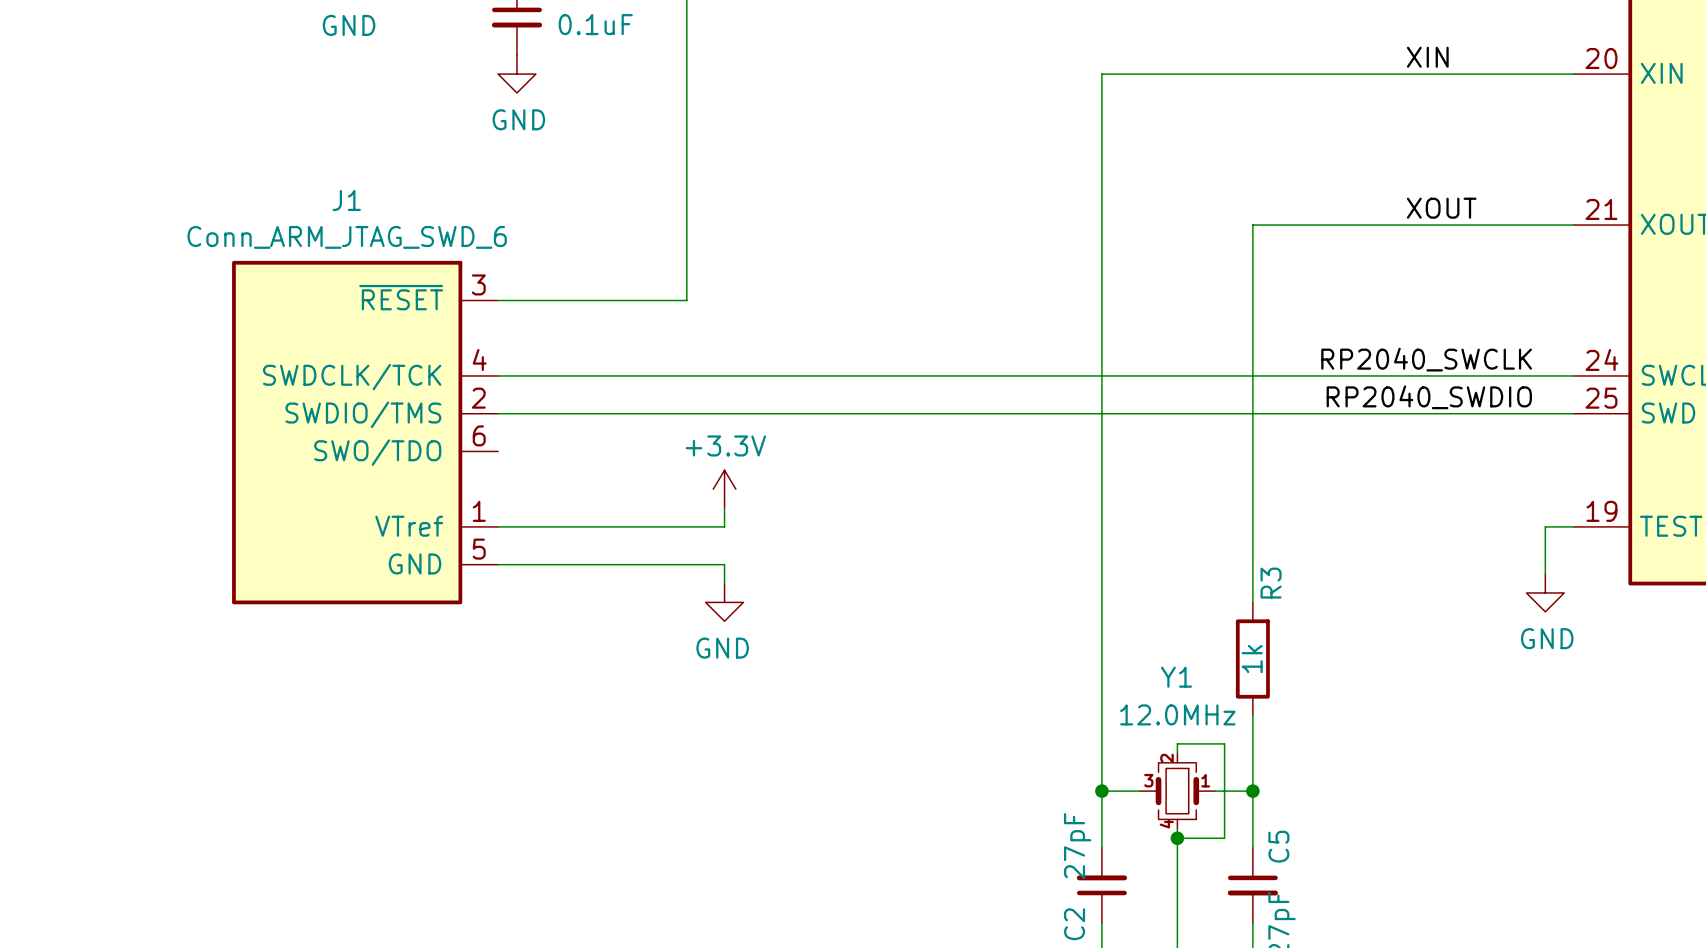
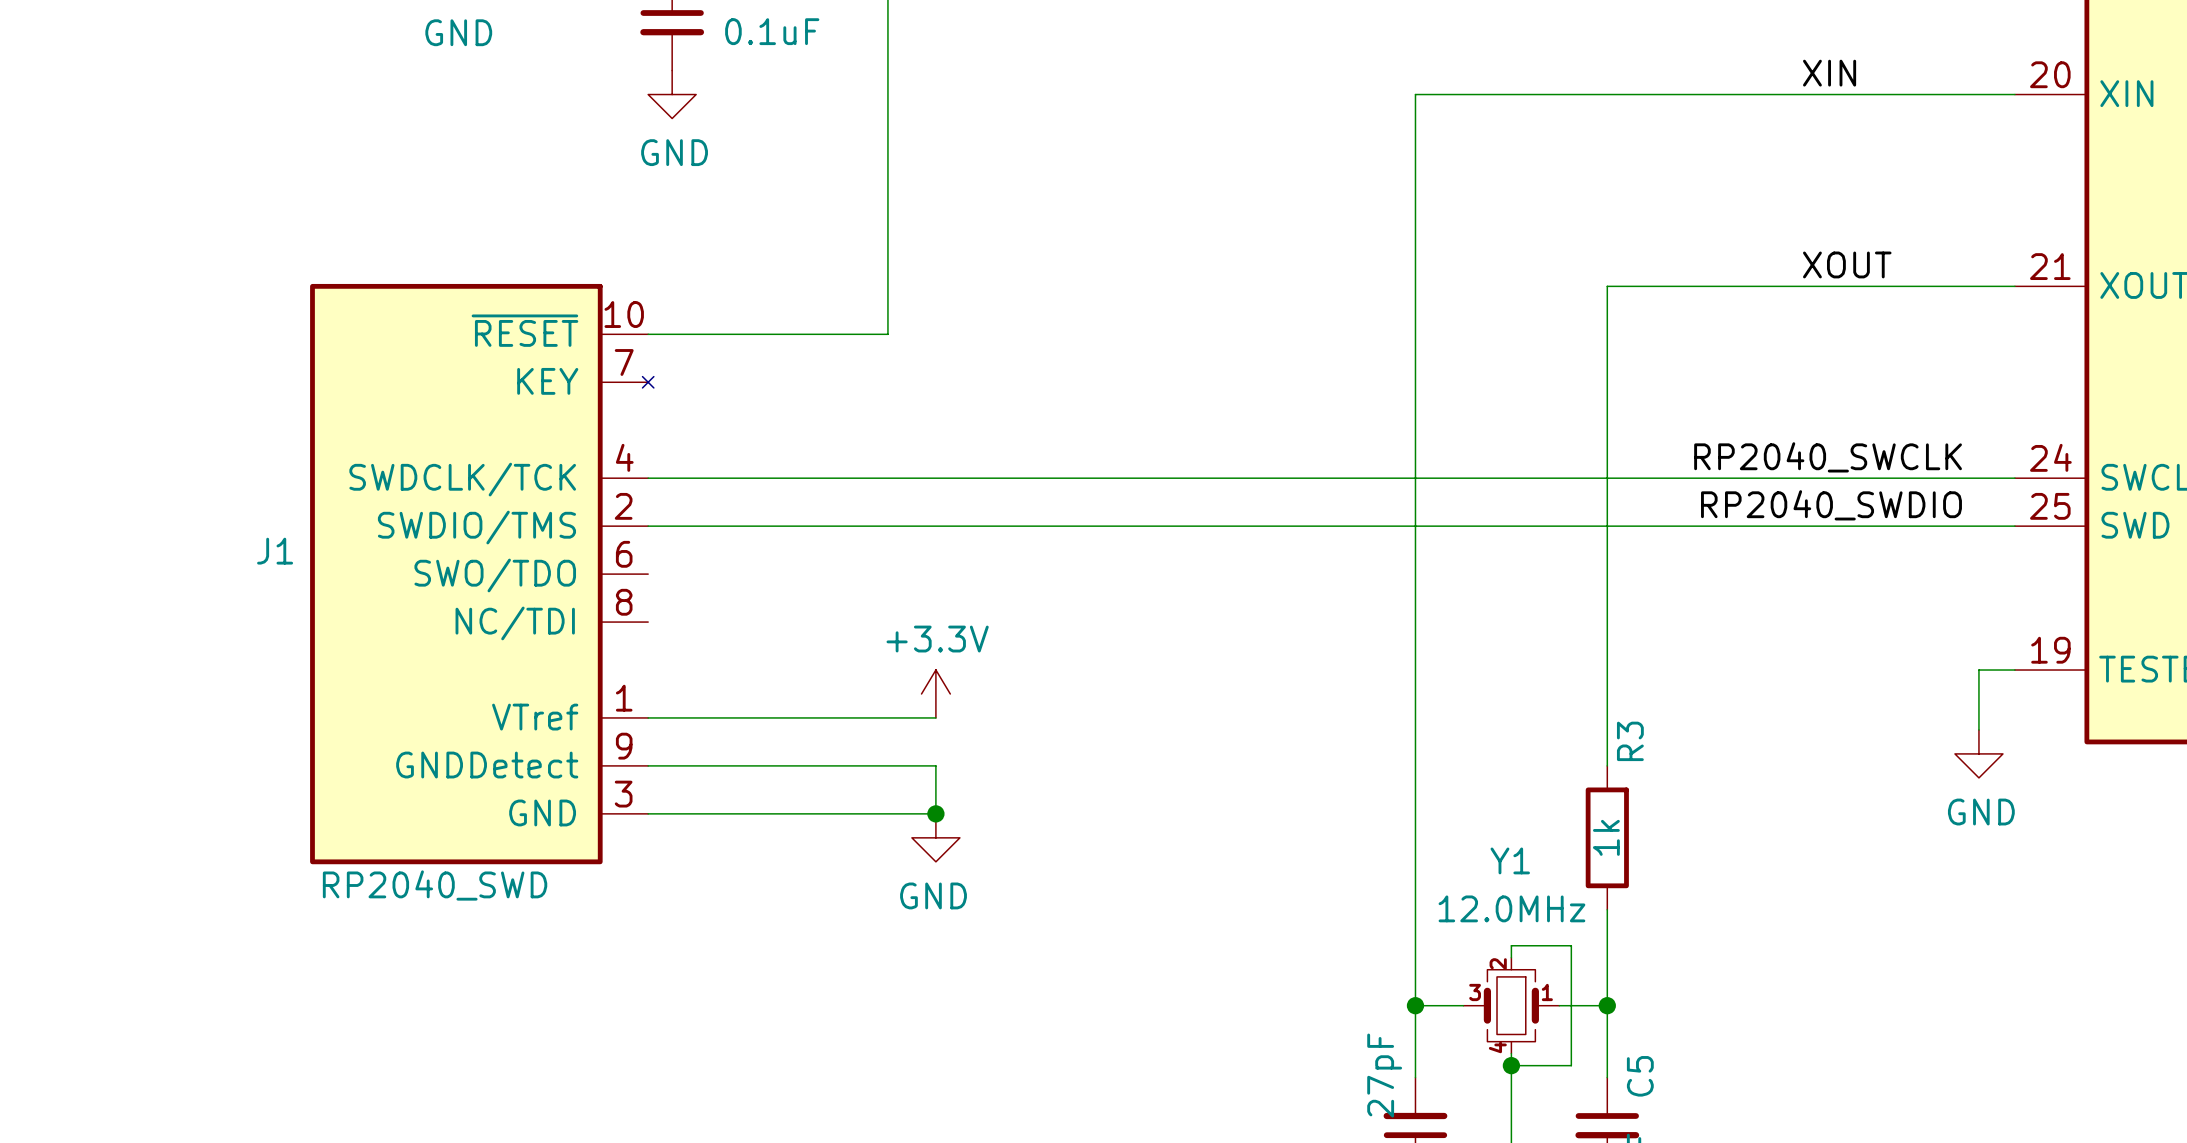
J1 name position: J1 (346, 200) -> J1 (275, 551)
J1 value: Conn_ARM_JTAG_SWD_6 (347, 237) -> RP2040_SWD (435, 885)
J1 symbol: [232, 260, 499, 605] -> [310, 283, 654, 865]
wire: (686, 262) (686, 300) (498, 300) -> (887, 334) (648, 334)
power symbol position: +3.3V (724, 489) -> +3.3V (935, 693)
wire: (724, 508) (724, 526) (498, 526) -> none
wire: (724, 564) (724, 583) -> none
wire: none -> (648, 765) (935, 765) (935, 813) (648, 813)
power symbol position: GND (724, 602) -> GND (935, 837)
junction: none -> (935, 813)

